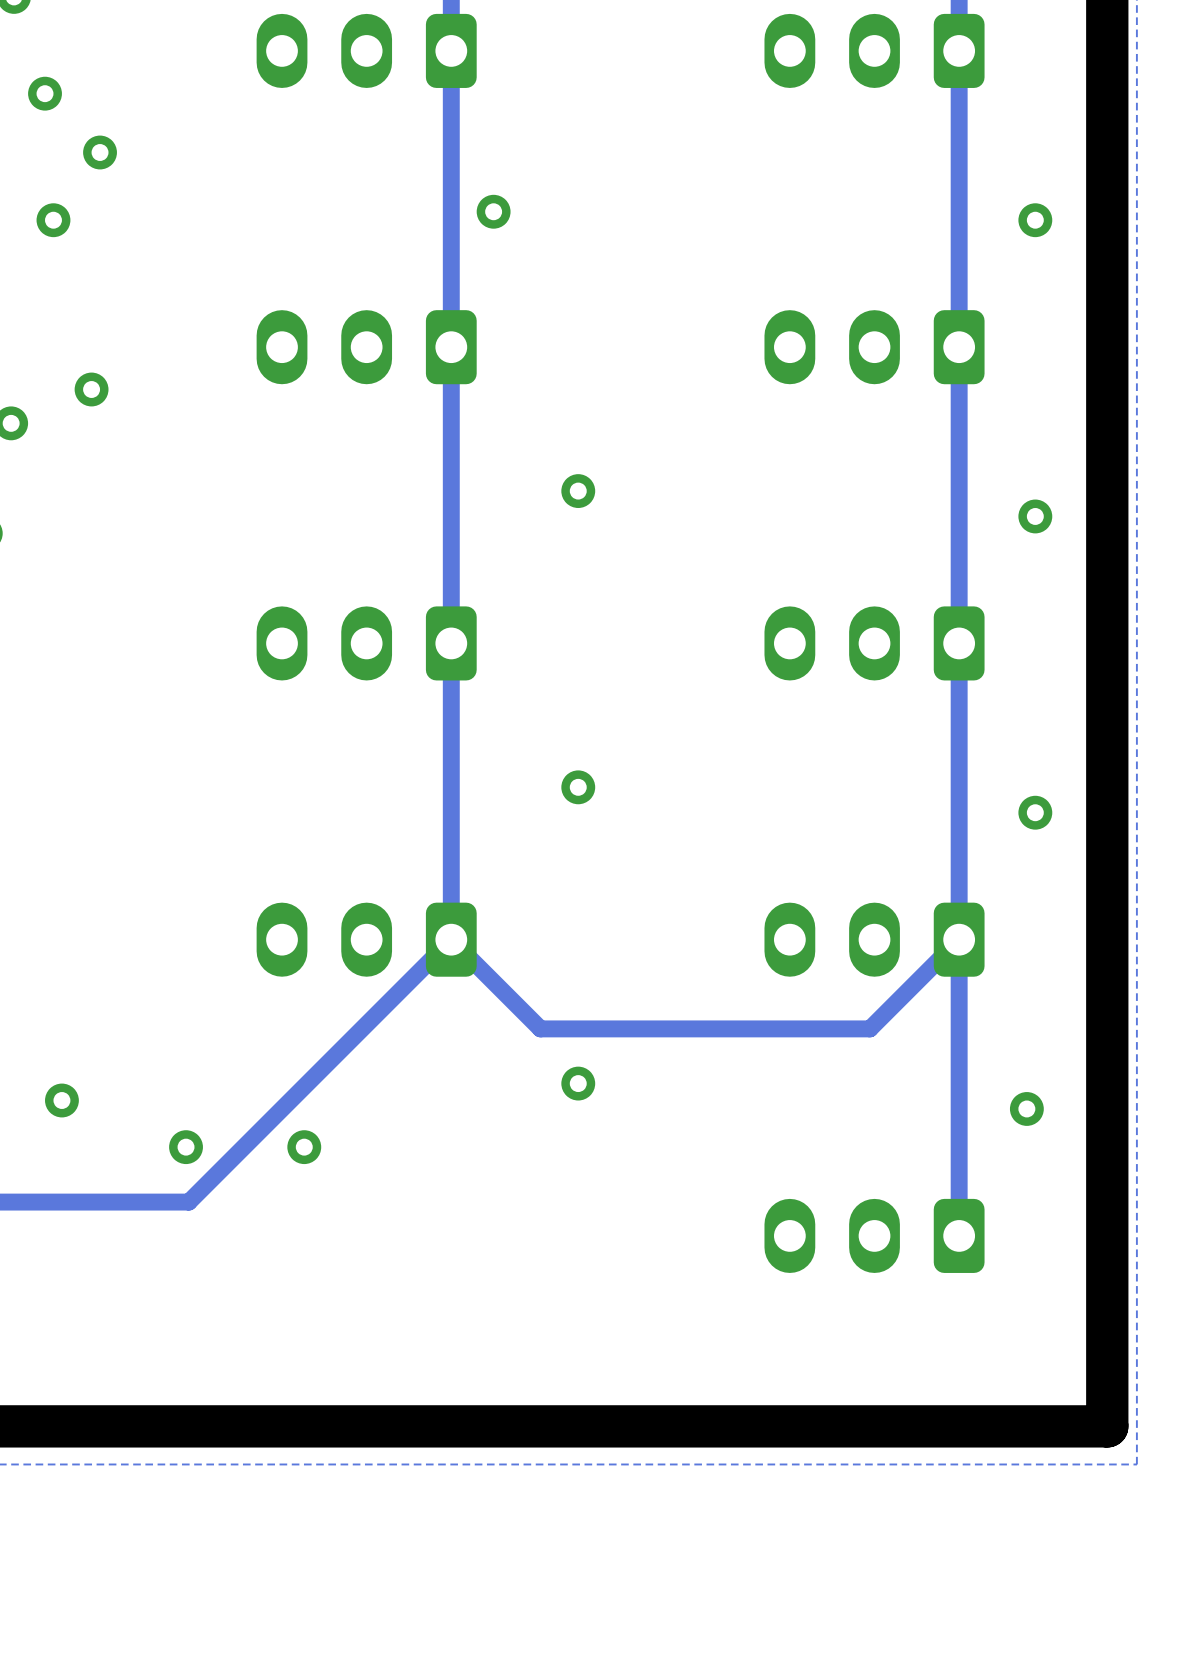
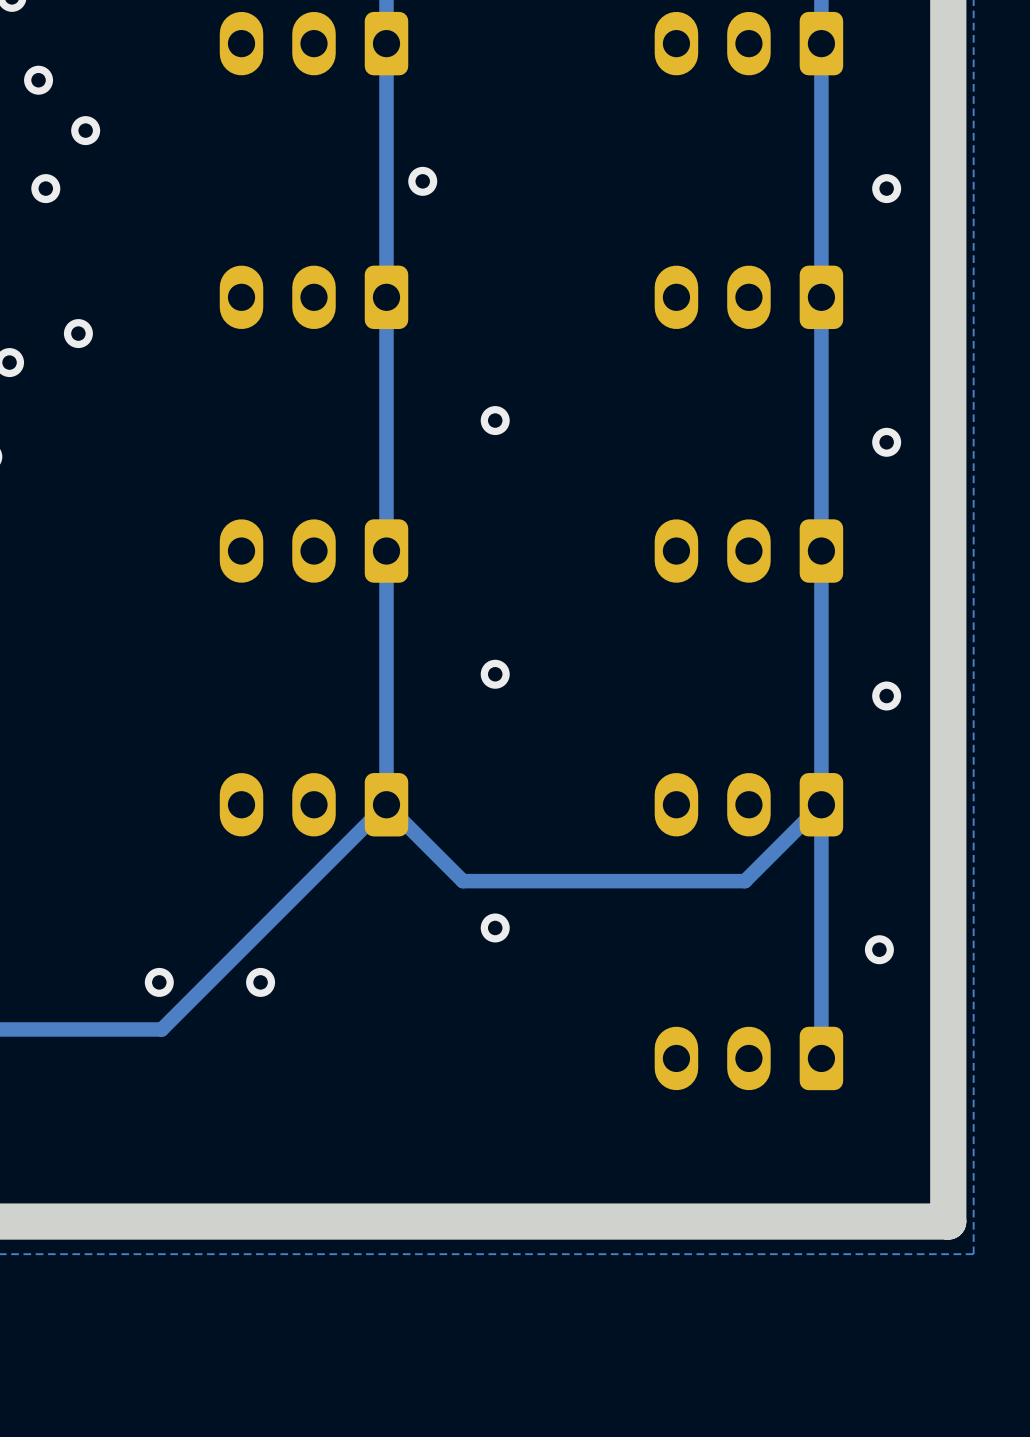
via: (61, 1100) -> none

